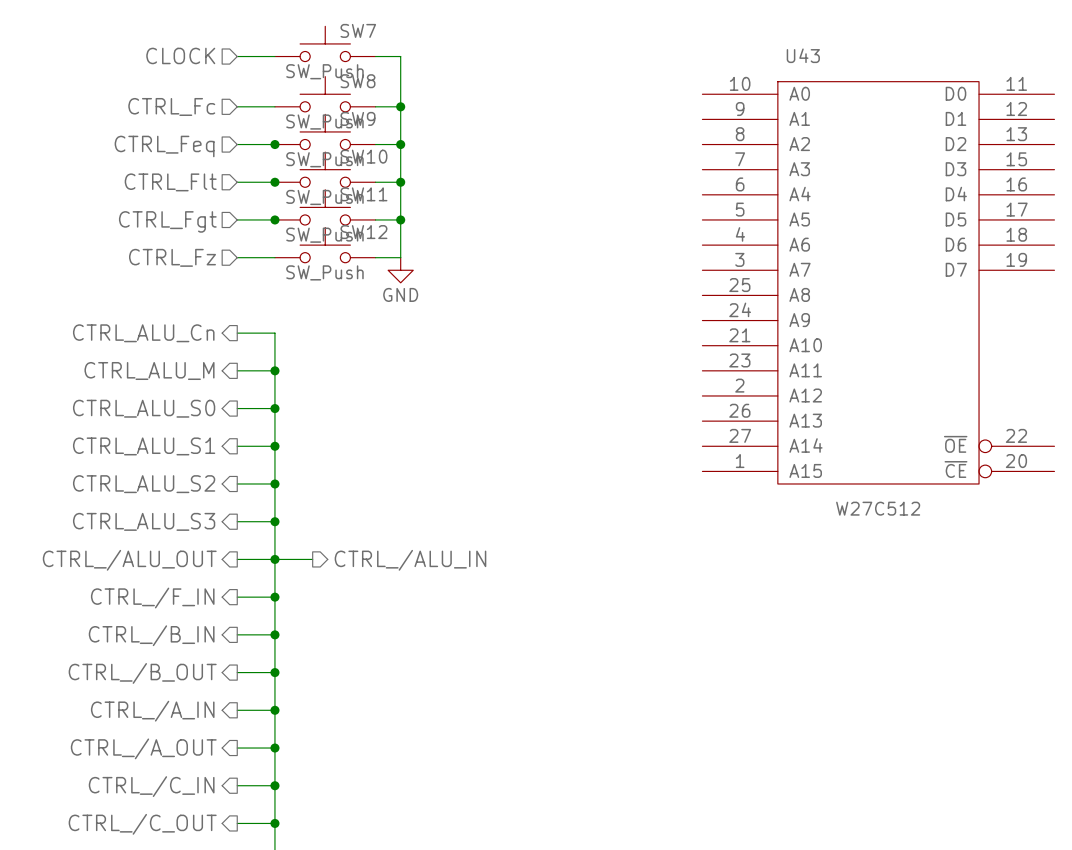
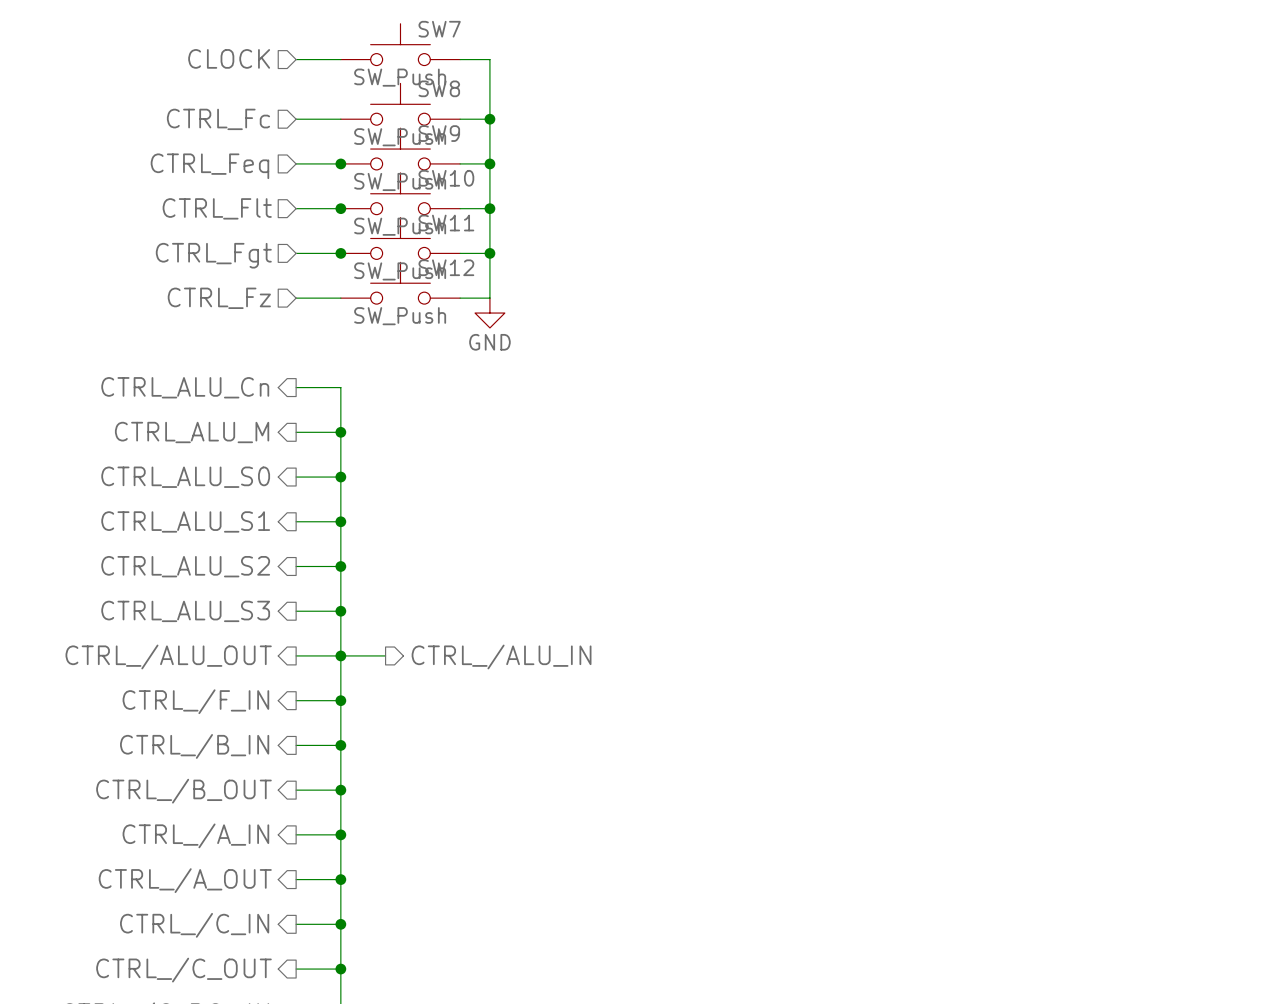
U43: W27C512 (878, 282) -> none

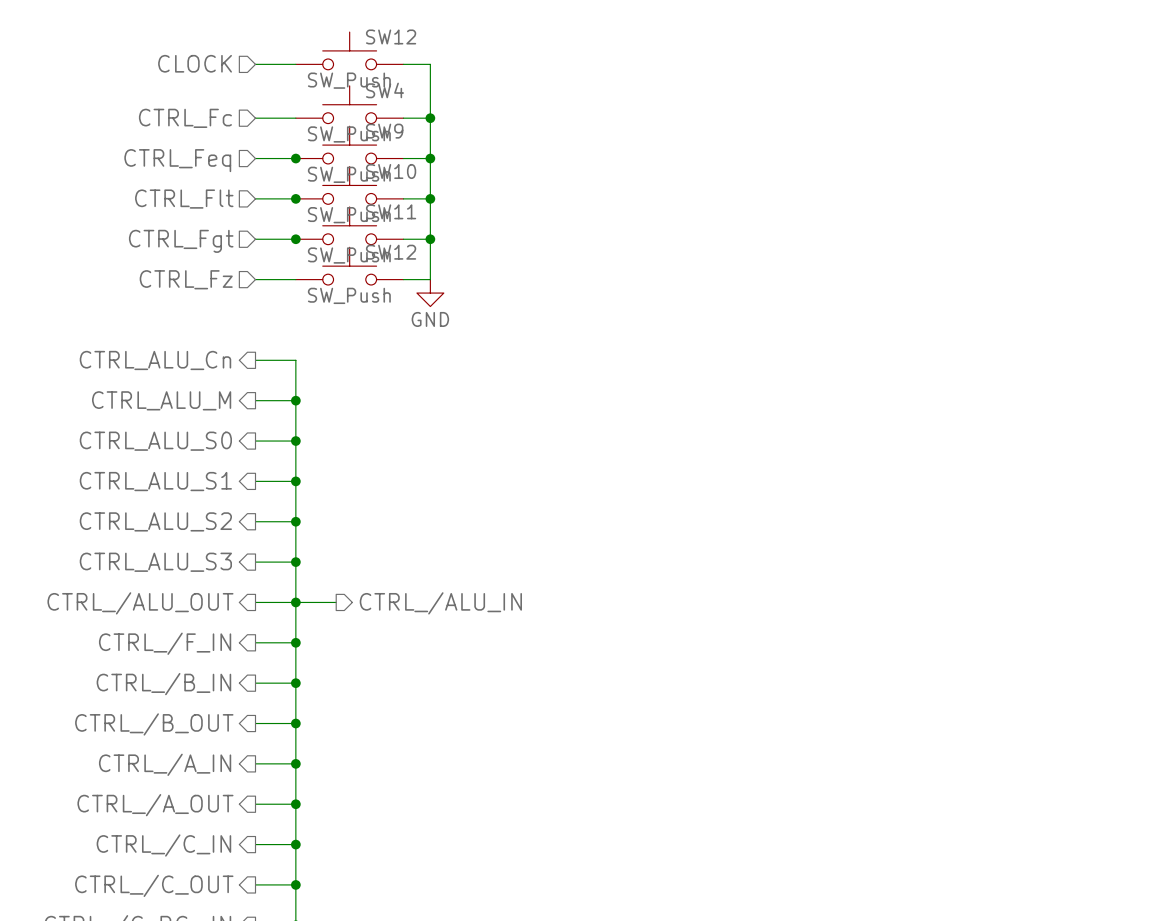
SW7 name: SW7 (439, 29) -> SW12 (391, 36)
SW8 name: SW8 (439, 88) -> SW4 (384, 90)

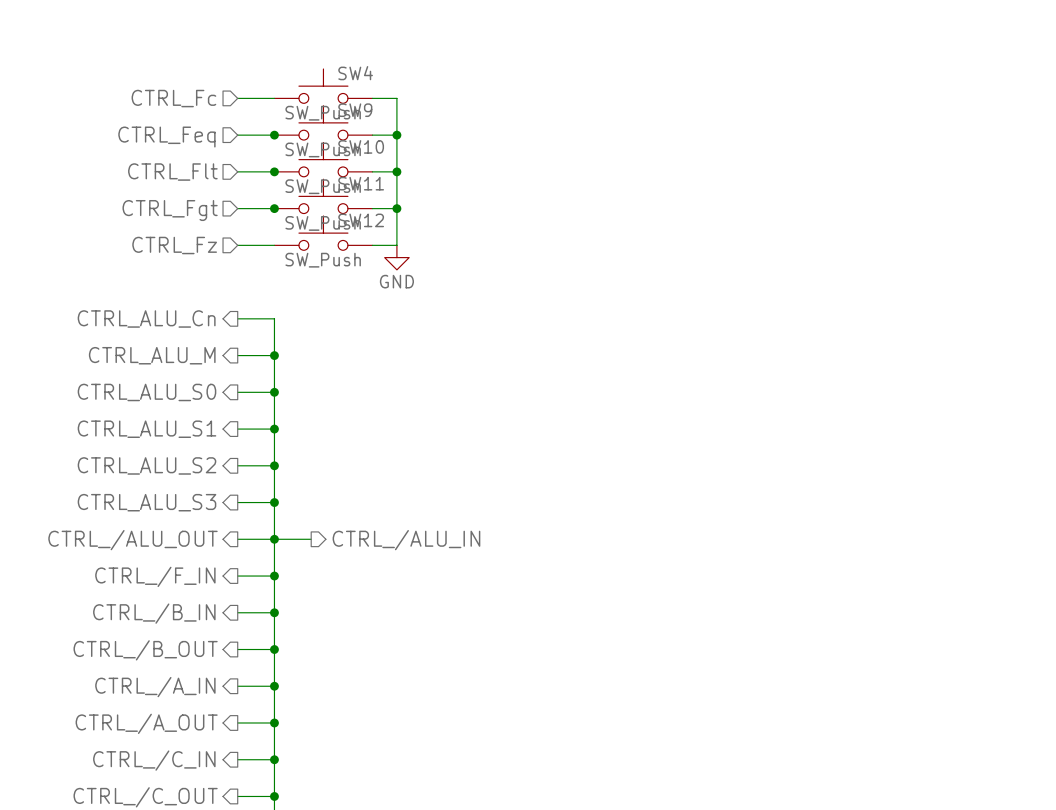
SW12: SW_Push (349, 50) -> none
hierarchical label: CLOCK (195, 63) -> none
wire: (255, 64) (295, 64) -> none
wire: (403, 64) (430, 64) (430, 118) -> none
junction: (430, 118) -> none

